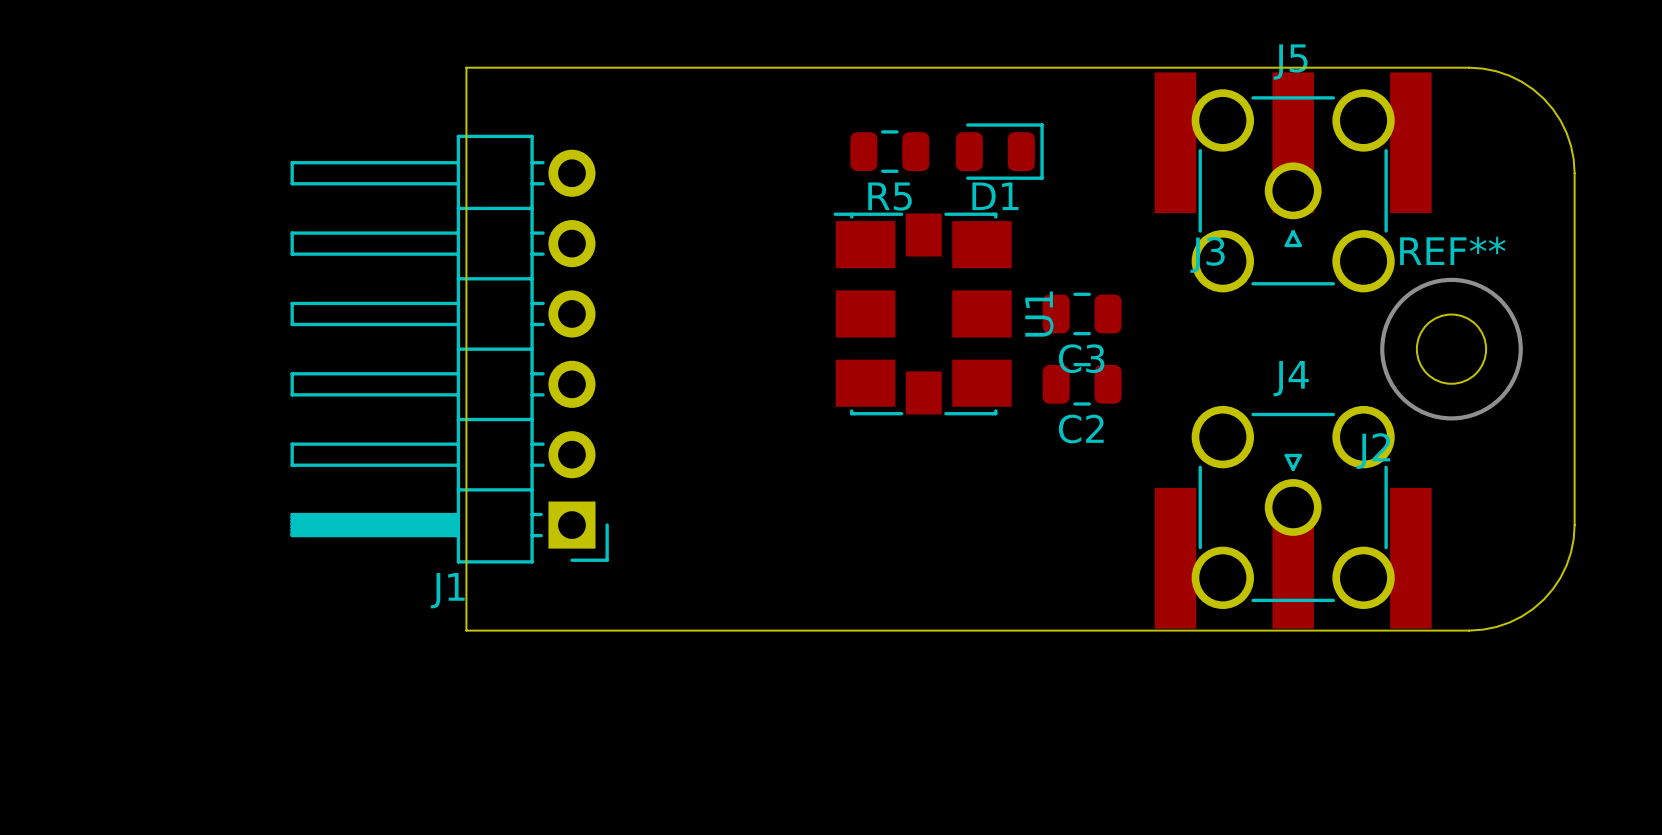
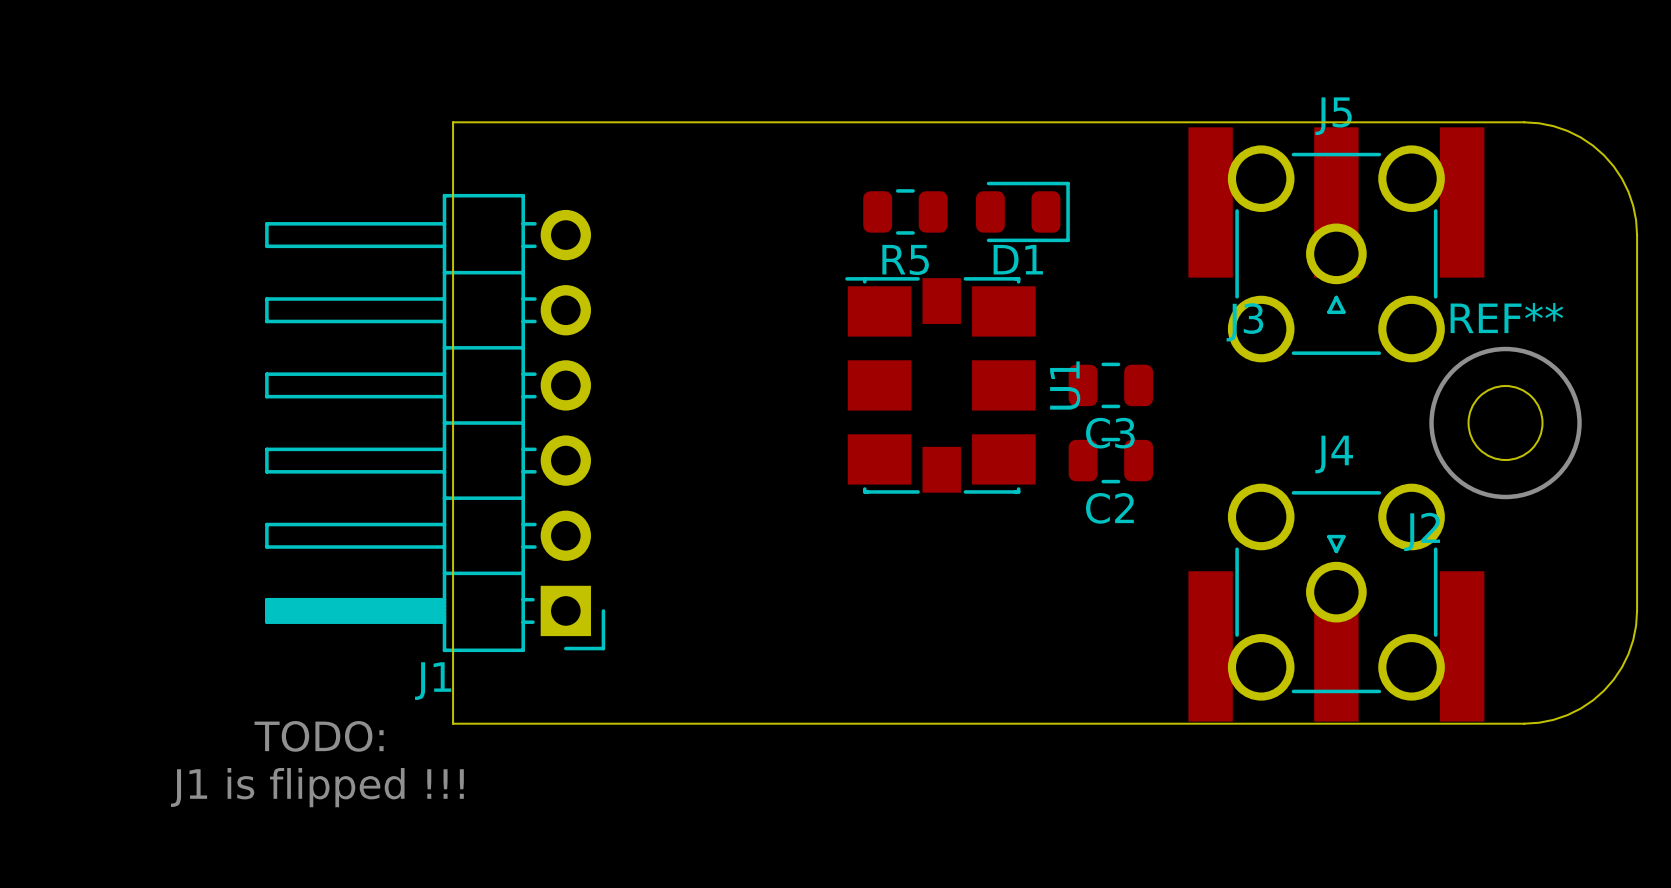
text: none -> TODO: (319, 736)
text: none -> J1 is flipped !!! (317, 787)

